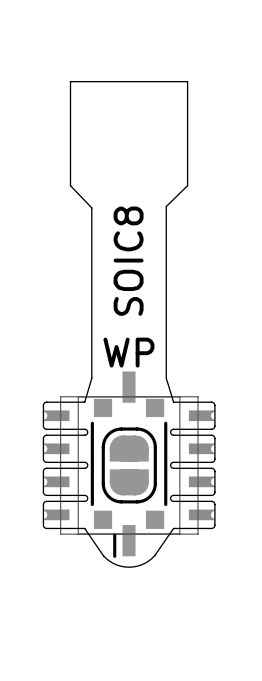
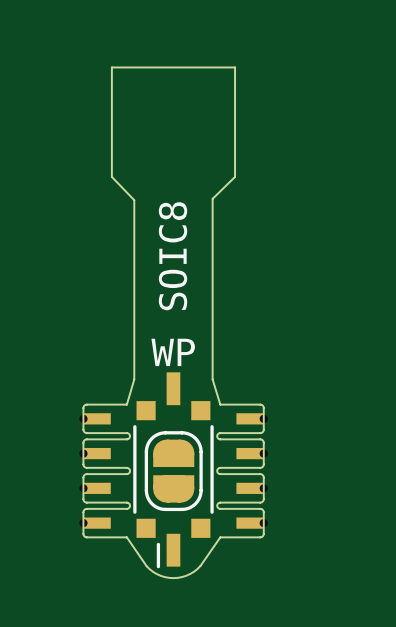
line: (60, 396) (198, 396) (198, 534) (60, 534) (60, 396) -> none
line: (78, 396) (78, 534) -> none
line: (179, 396) (179, 534) -> none

